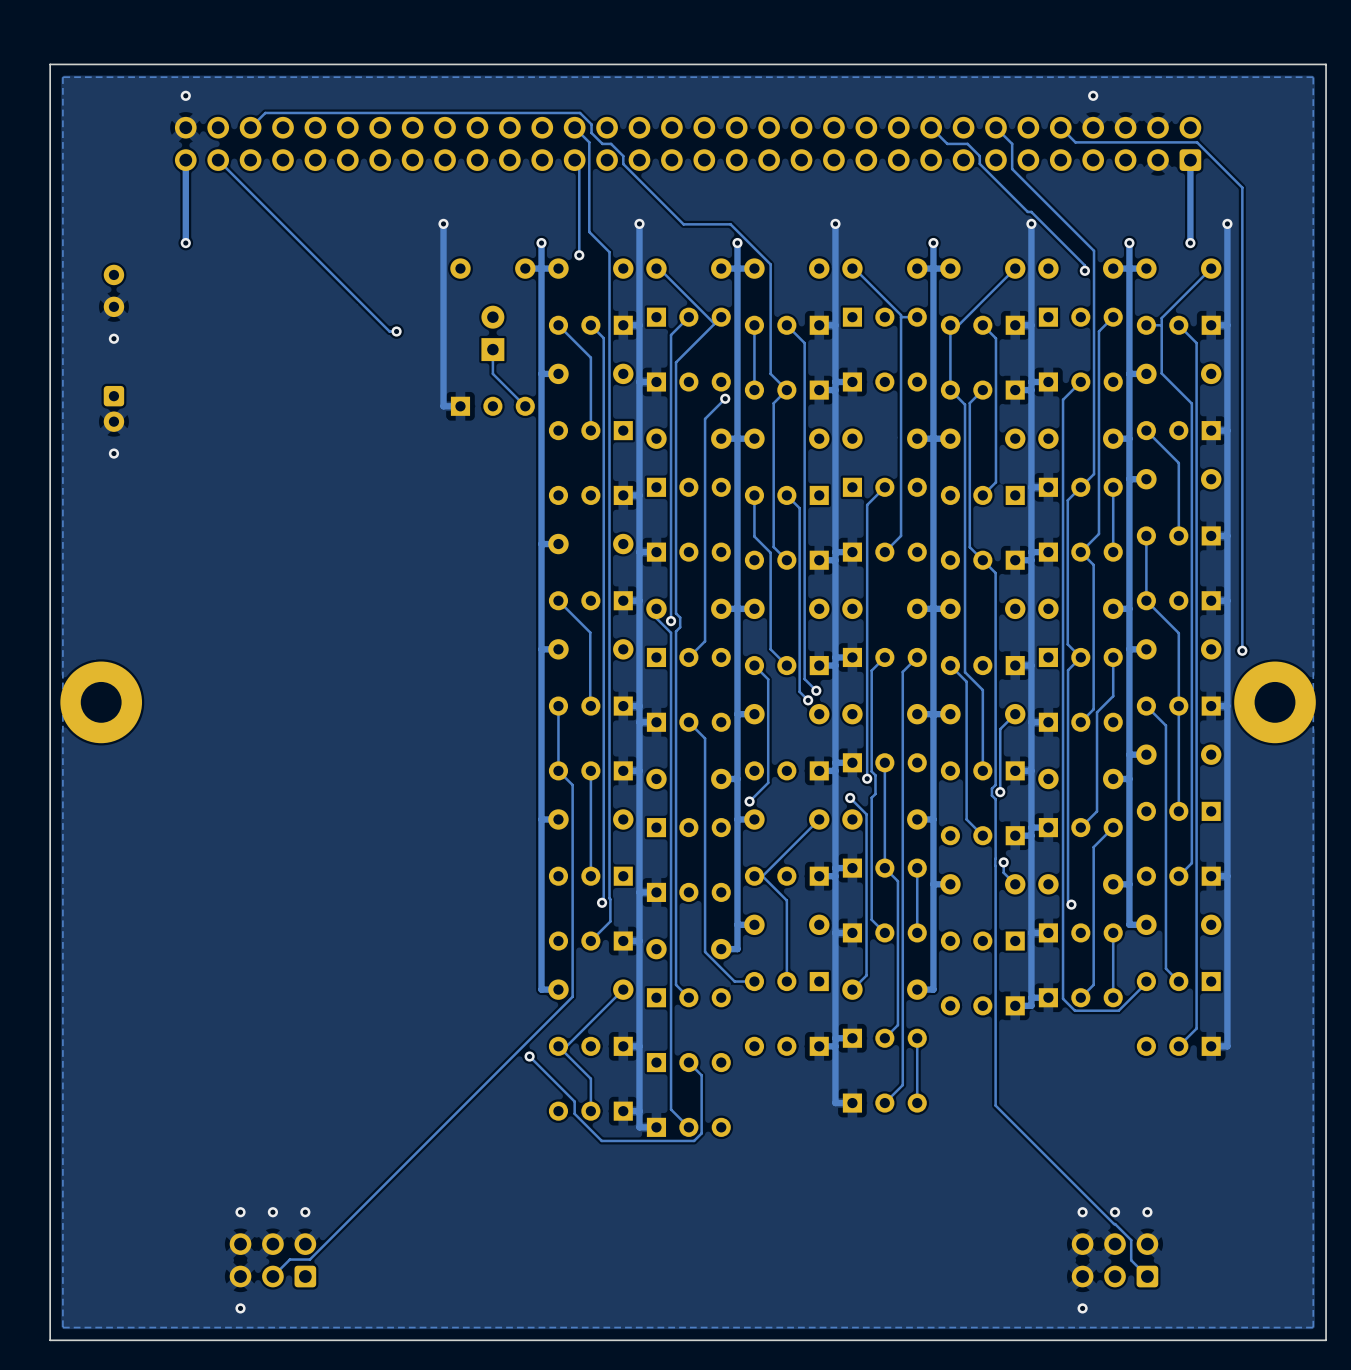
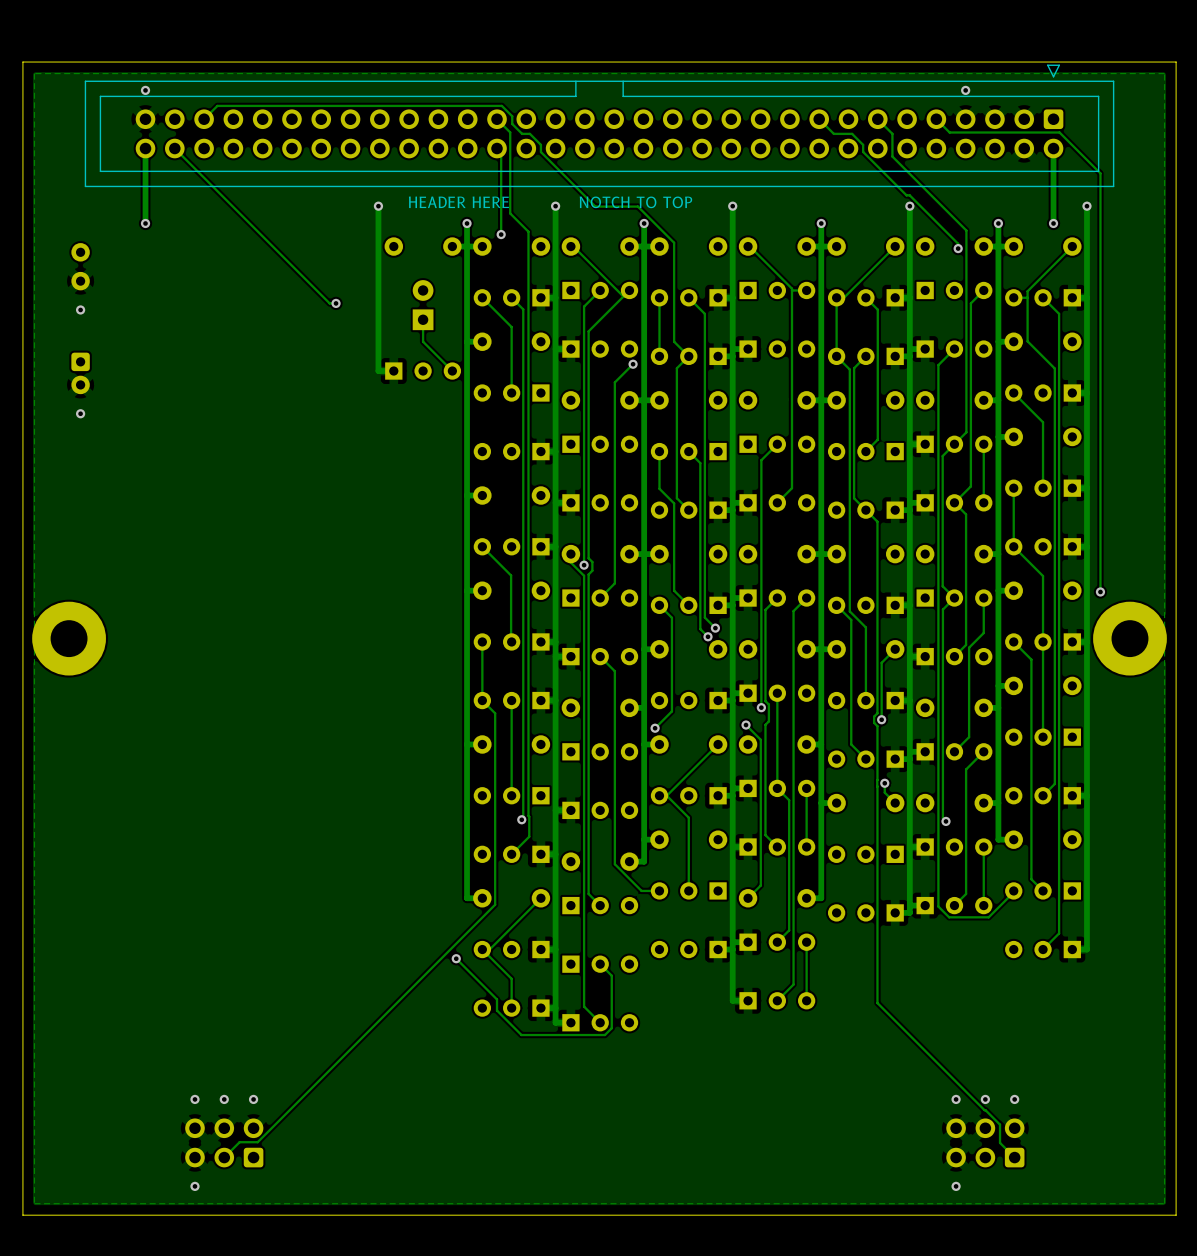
part side: top (688, 143) -> bottom (599, 125)
text: none -> HEADER HERE (458, 202)
text: none -> NOTCH TO TOP (635, 202)

